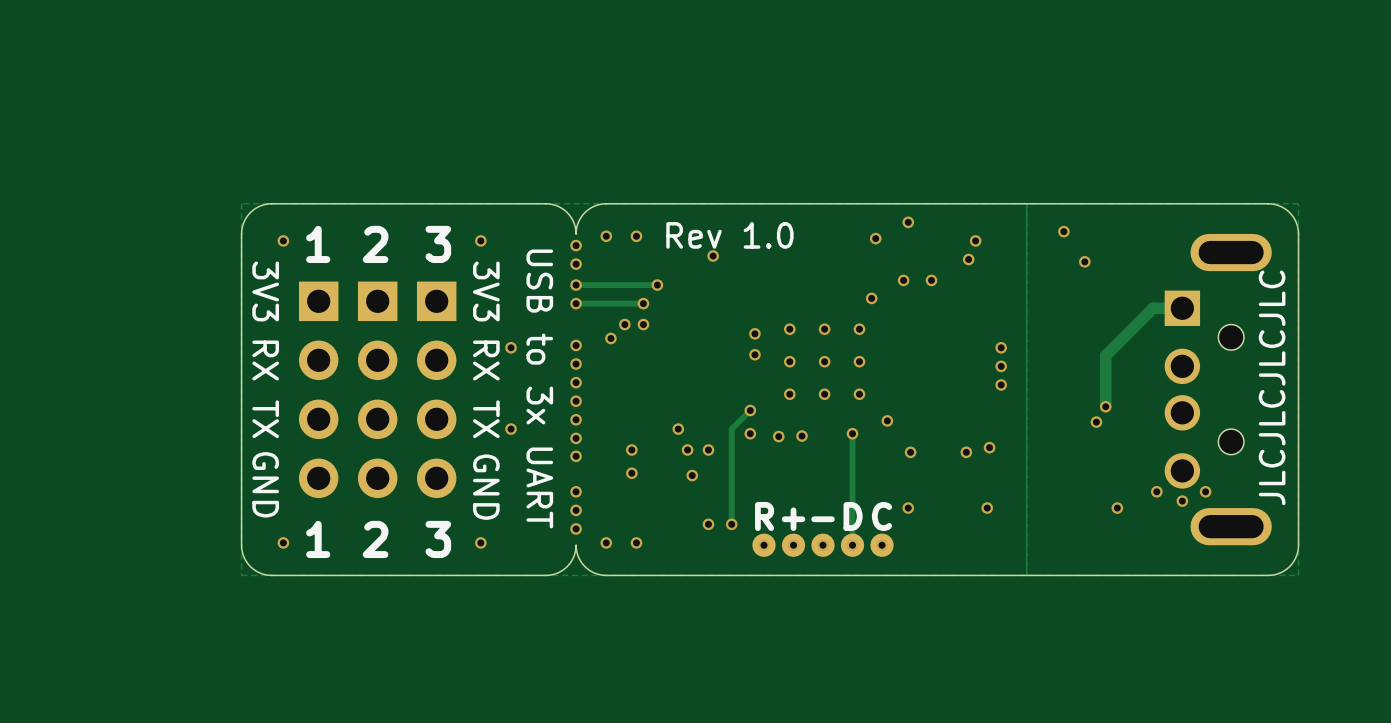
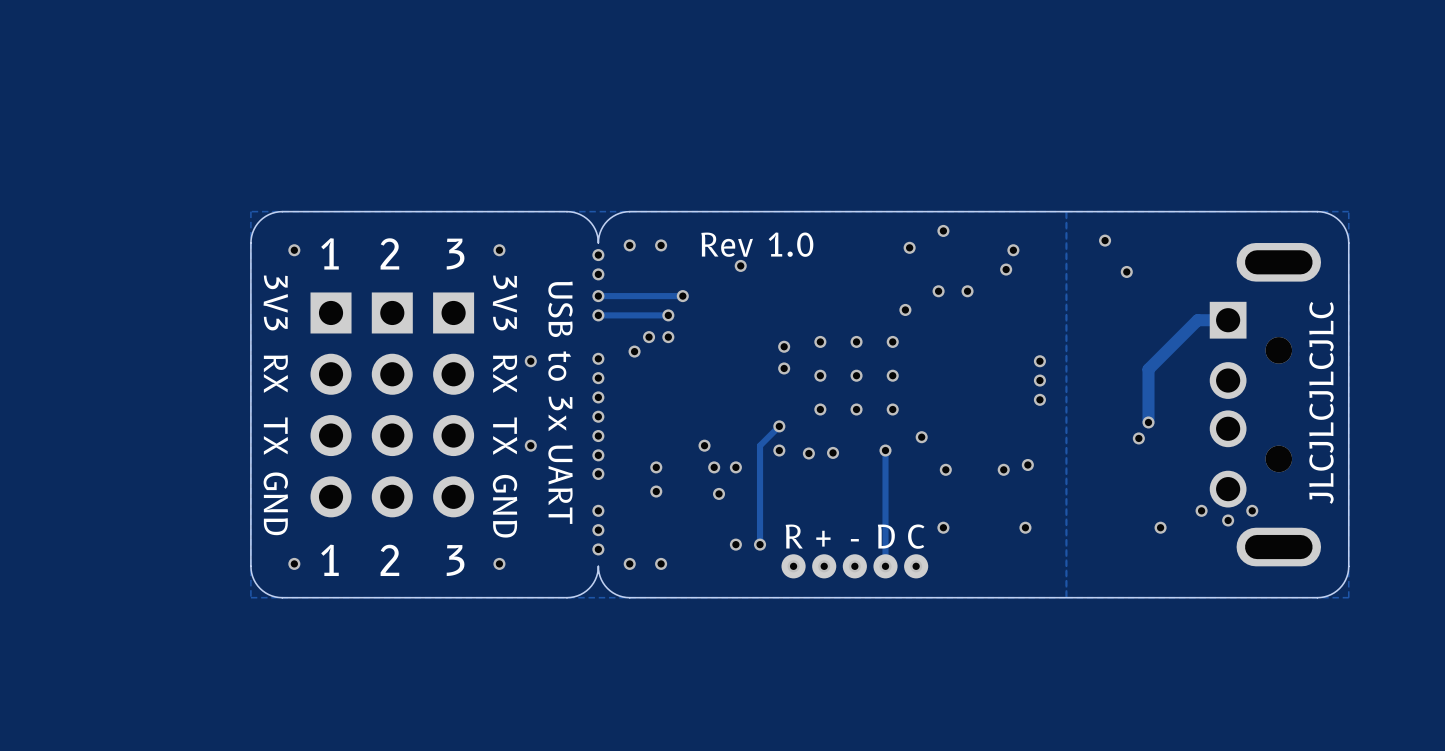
part footprint: [1164, 233, 1272, 546] -> [1209, 243, 1322, 567]

